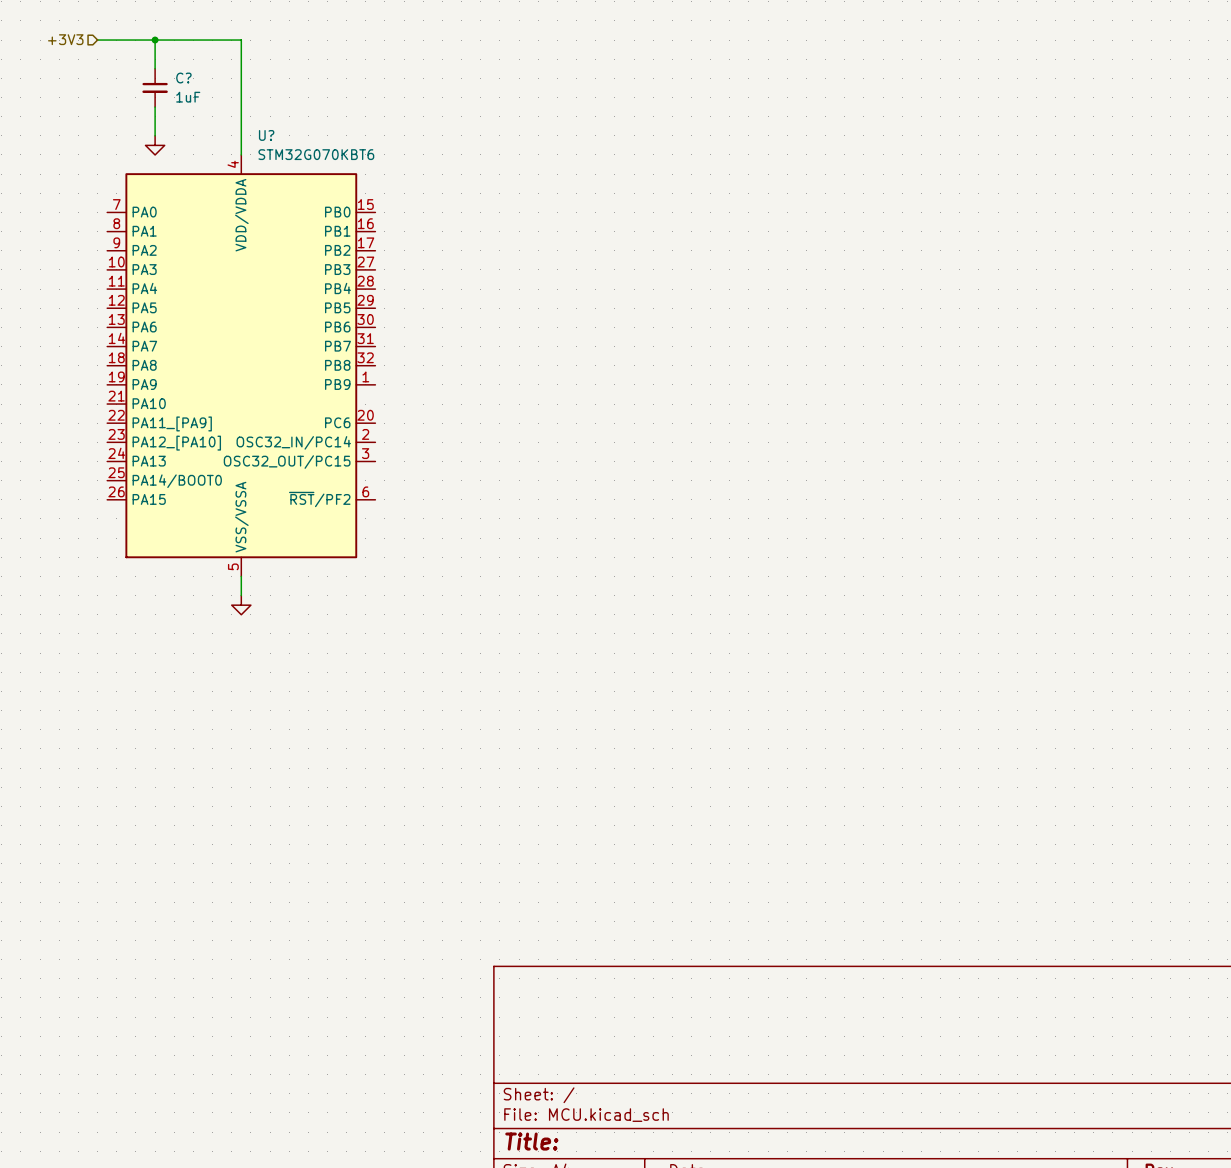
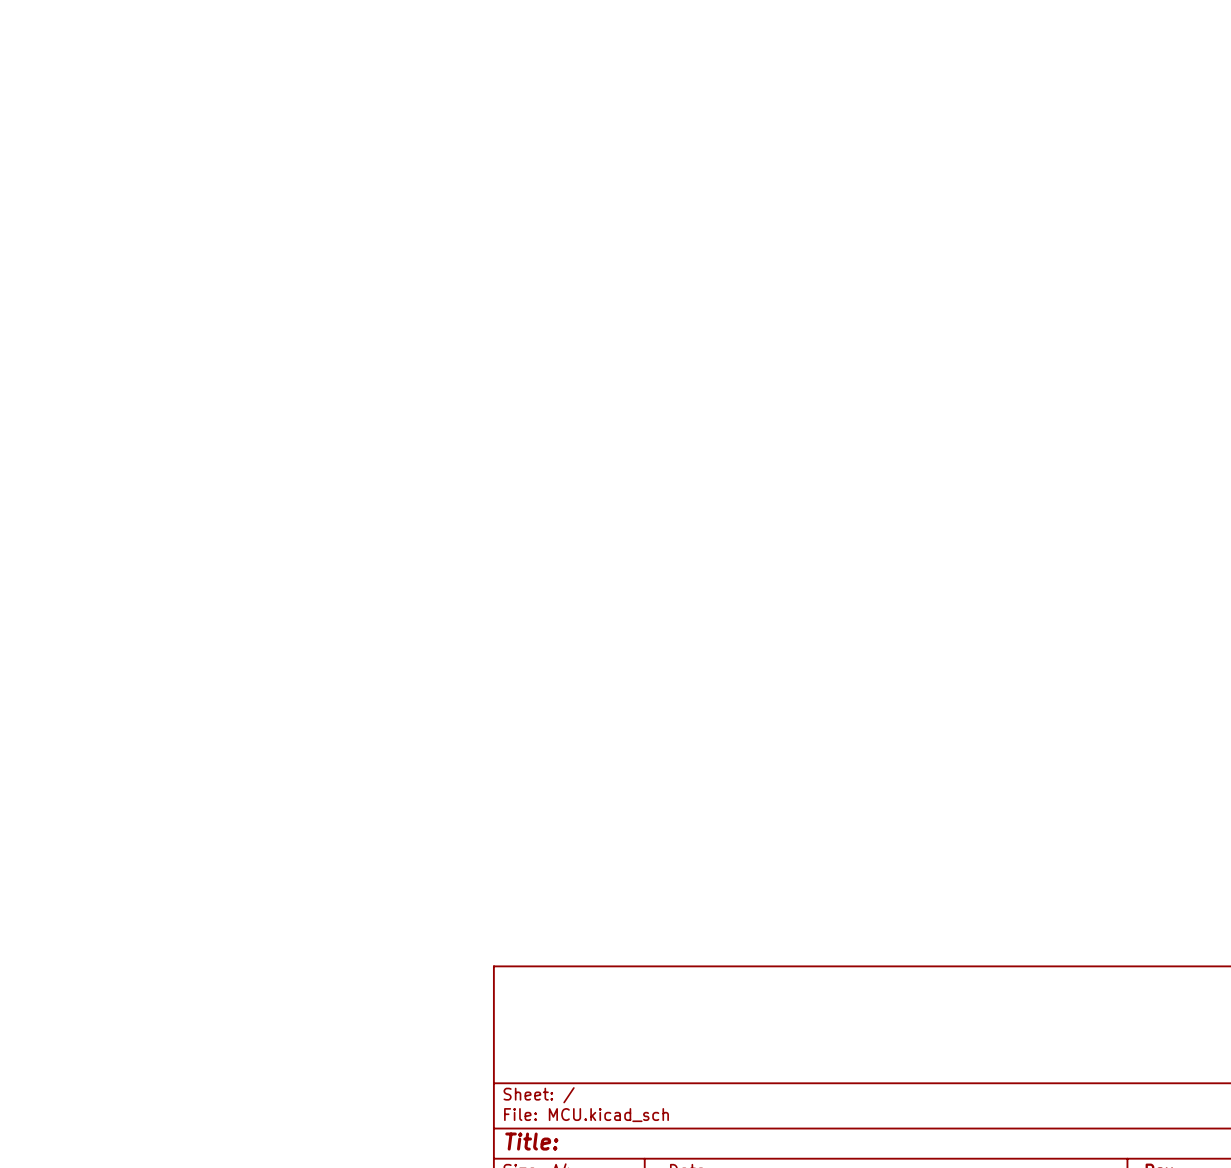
hierarchical label: +3V3 (65, 39) -> none
wire: (97, 40) (241, 40) (241, 154) -> none
wire: (155, 40) (155, 68) -> none
junction: (155, 40) -> none
C?: 1uF (155, 87) -> none
wire: (155, 107) (155, 135) -> none
power symbol: (155, 145) -> none
U?: STM32G070KBT6 (241, 365) -> none
wire: (241, 576) (241, 595) -> none
power symbol: (241, 605) -> none

